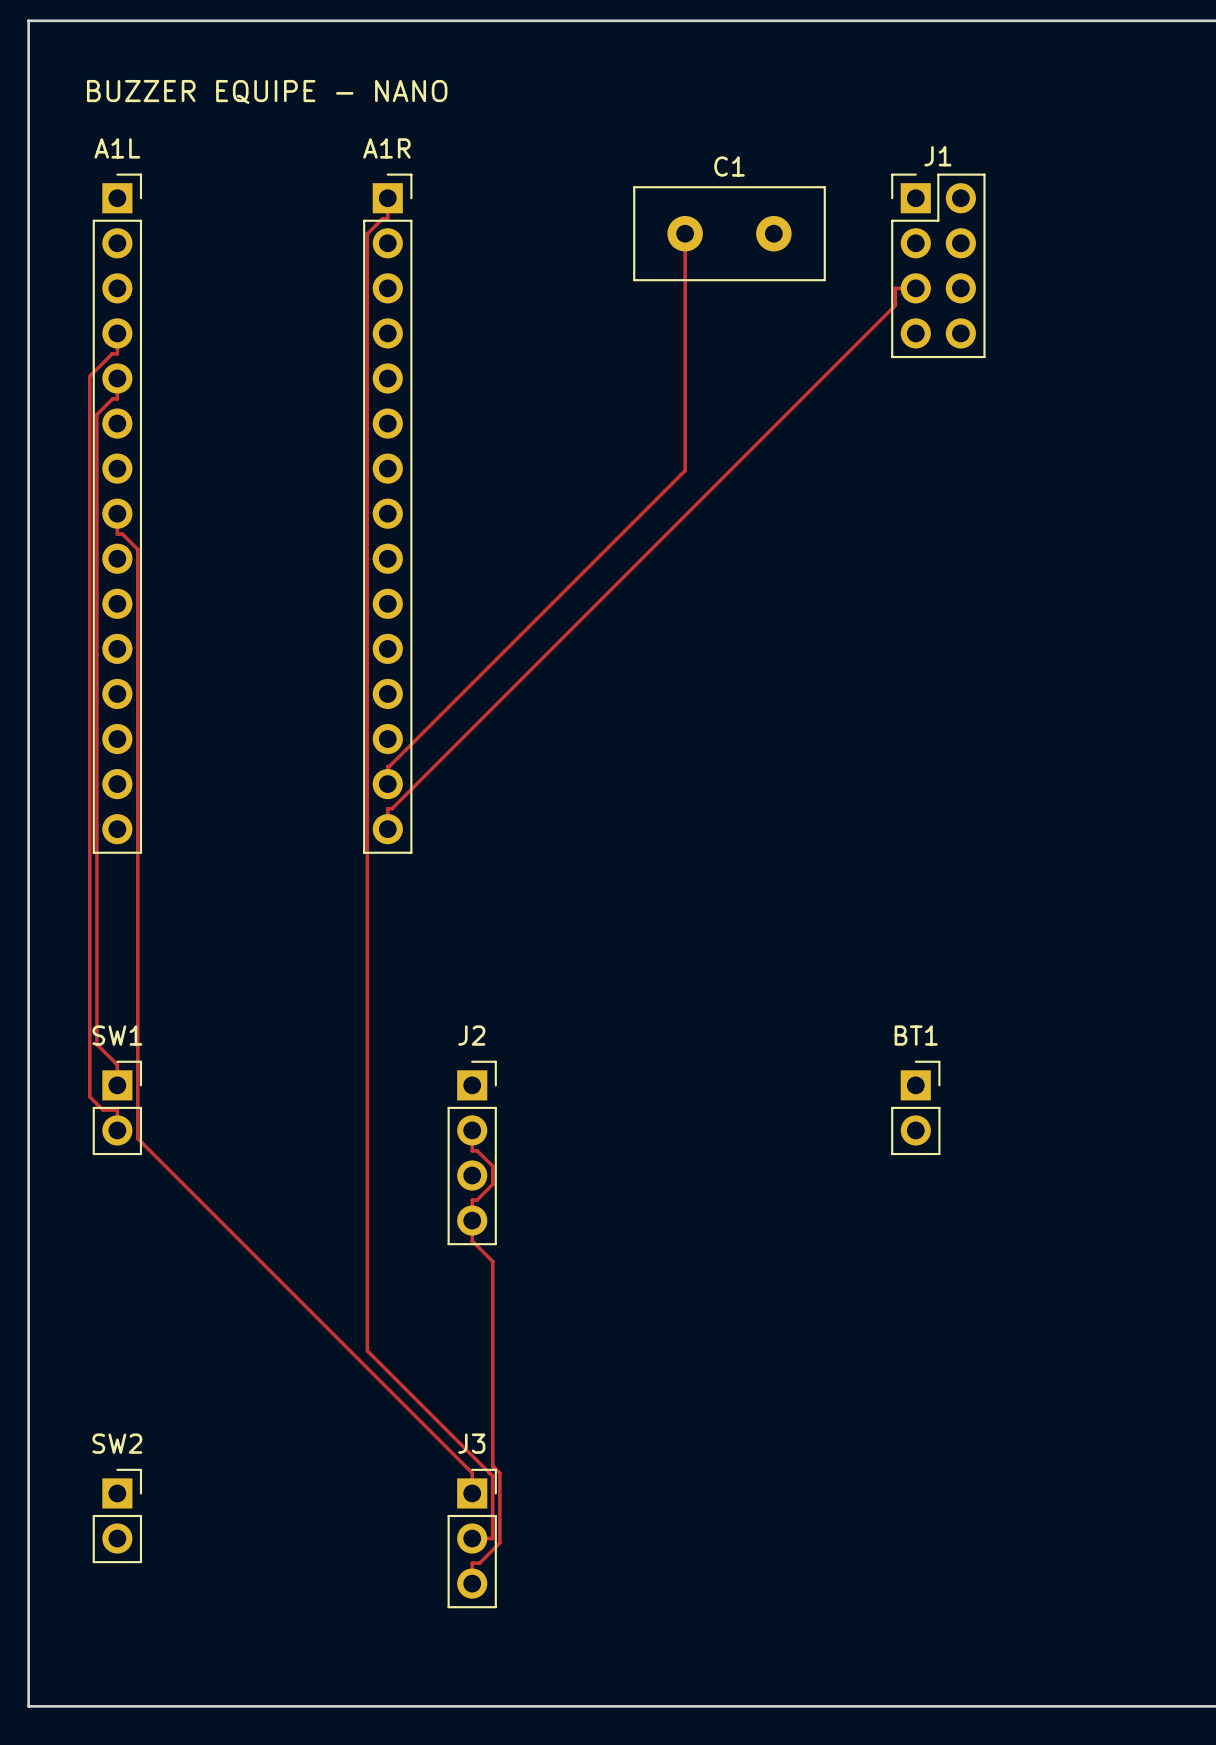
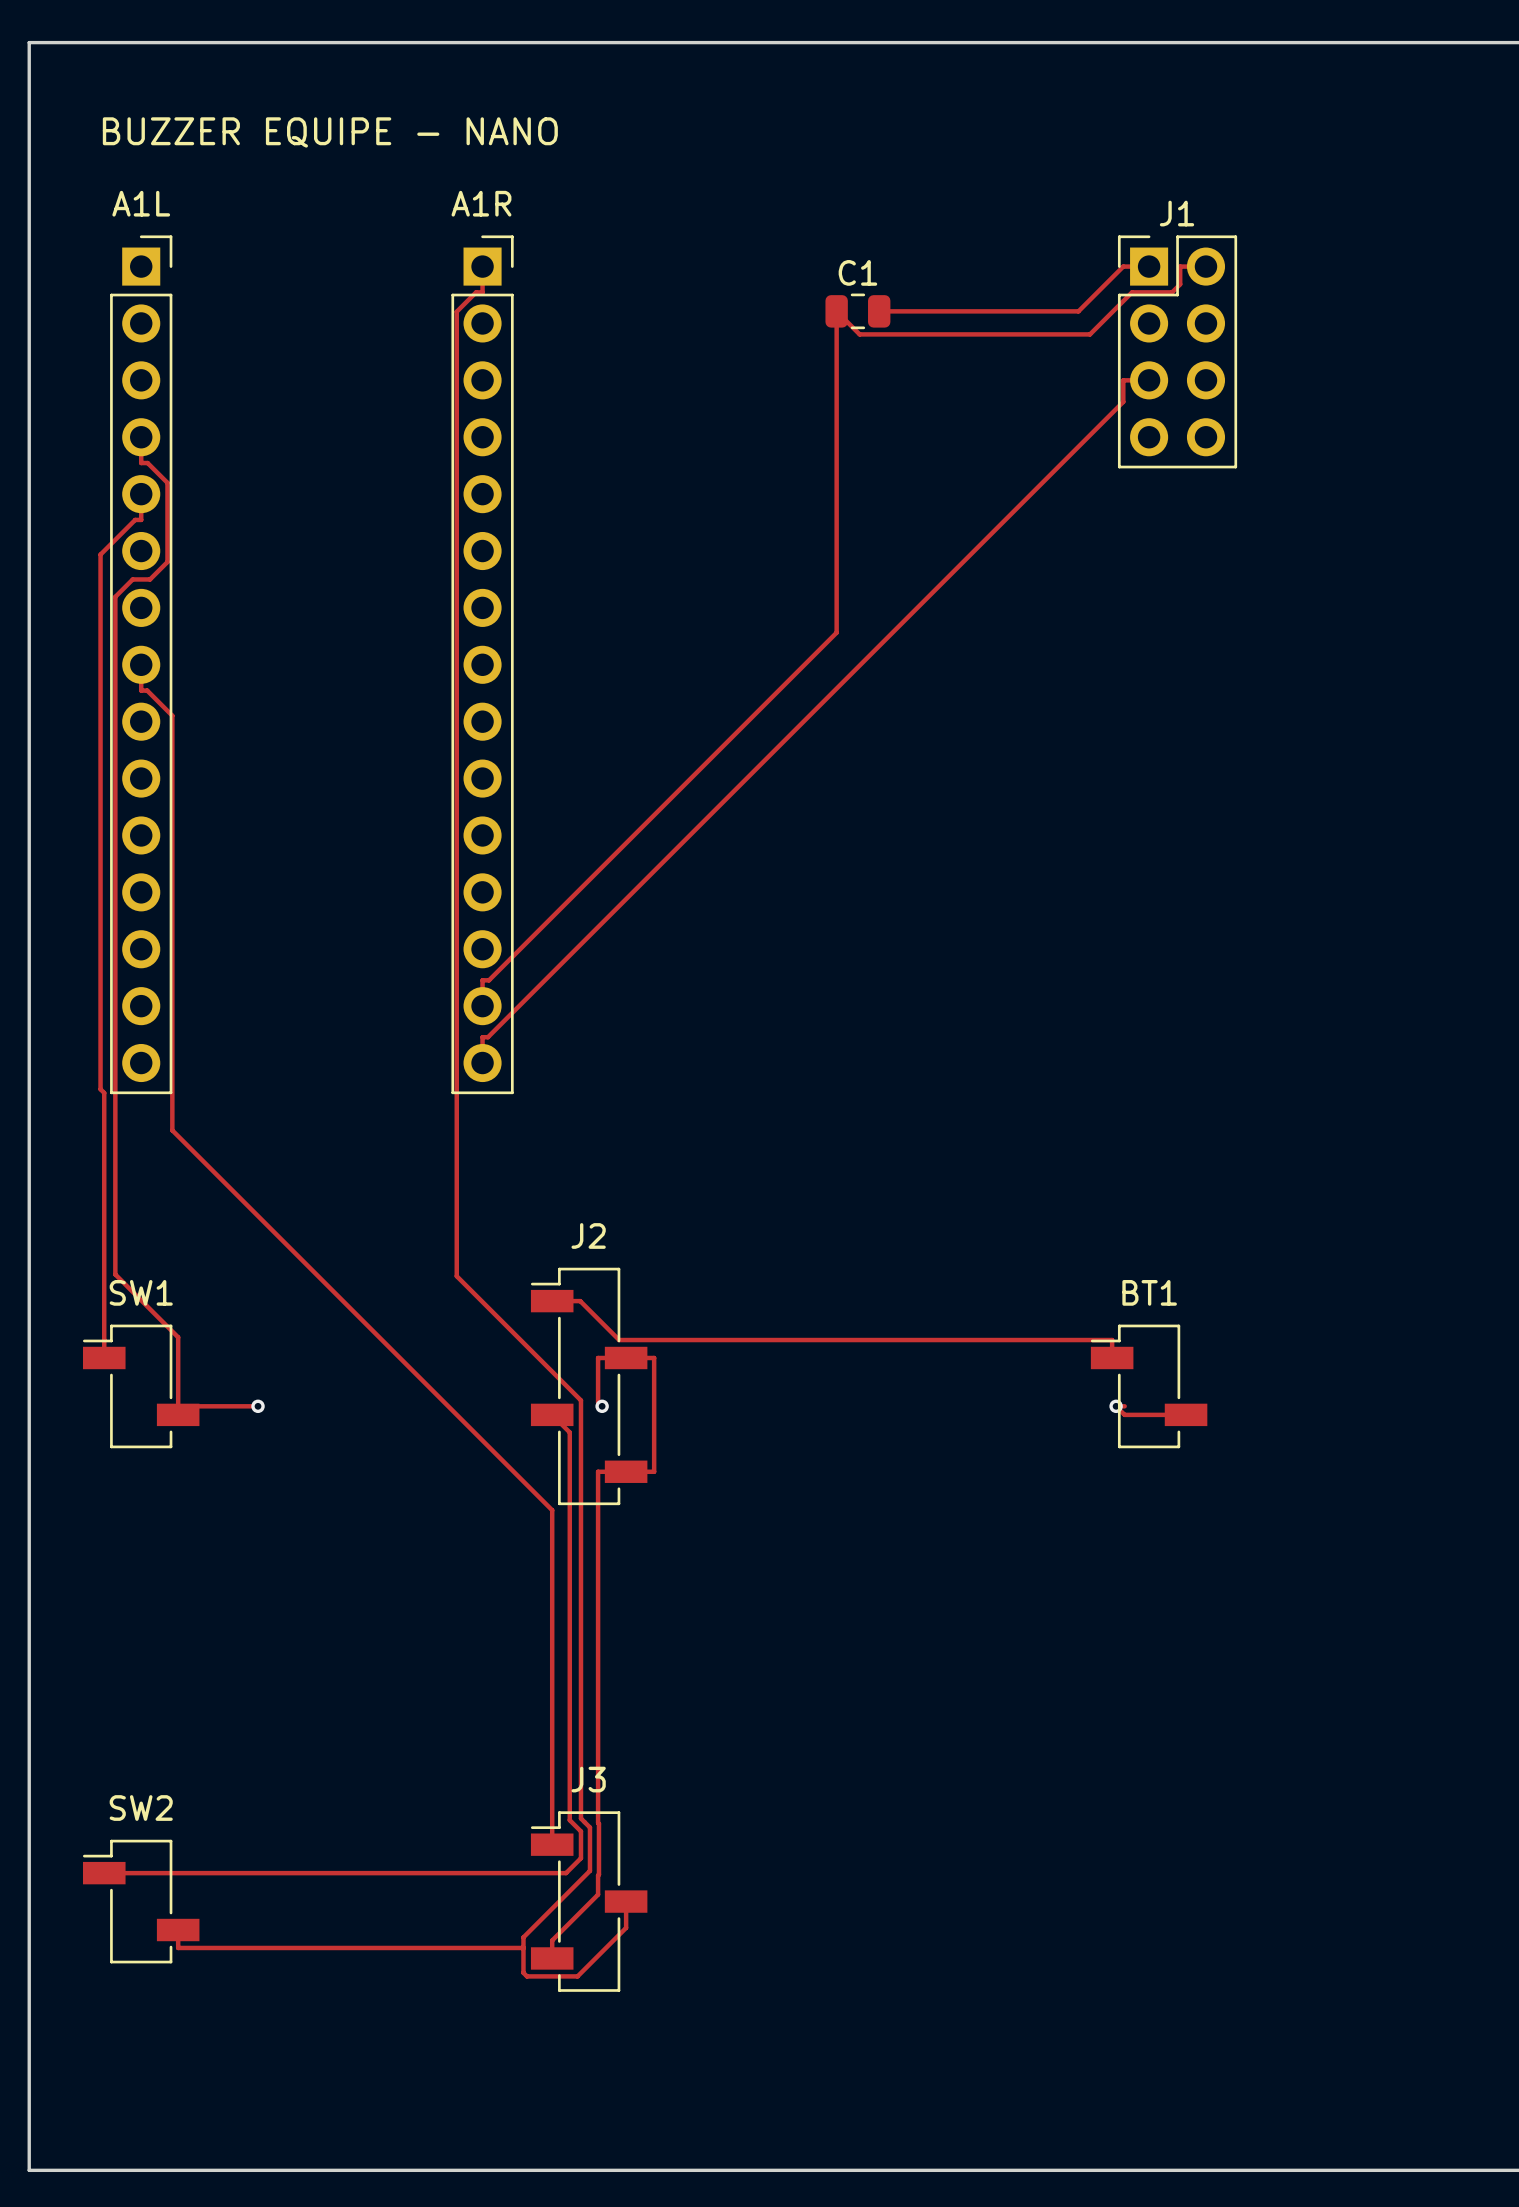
C1 name position: C1 (729, 166) -> C1 (857, 272)
C1 footprint: [633, 186, 826, 282] -> [825, 293, 891, 330]
track: none -> (1149, 266) (1123, 266) (1078, 311) (879, 311)
track: (685, 233) (685, 470) (387, 766) -> (1205, 266) (1180, 266) (1180, 284) (1172, 292) (1132, 292) (1090, 334) (859, 334) (836, 311) (836, 632) (489, 980) (482, 980) (482, 984)
track: (117, 353) (112, 353) (89, 376) (89, 1096) (102, 1110) (117, 1110) (117, 1130) -> (141, 463) (147, 463) (167, 482) (167, 562) (150, 579) (132, 579) (115, 596) (115, 1274) (178, 1337) (178, 1414)
track: (96, 414) (96, 1044) (117, 1064) (117, 1085) -> (115, 539) (100, 554) (100, 1089) (104, 1092) (104, 1357)
track: (122, 534) (137, 549) (137, 1138) (472, 1473) (472, 1493) -> (147, 690) (172, 715) (172, 1130) (552, 1510) (552, 1844)
track: (367, 998) (367, 1350) (492, 1476) (492, 1538) (472, 1538) -> (456, 1276) (580, 1400) (580, 1818) (589, 1827) (589, 1870) (523, 1937) (523, 1972) (527, 1976) (577, 1976) (626, 1927) (626, 1901)
track: none -> (552, 1301) (580, 1301) (619, 1340) (1112, 1340) (1112, 1357)
SW1 footprint: [92, 1060, 143, 1156] -> [82, 1324, 200, 1449]
J2 footprint: [447, 1060, 497, 1246] -> [530, 1267, 648, 1506]
BT1 footprint: [891, 1060, 941, 1156] -> [1090, 1324, 1208, 1449]
track: none -> (178, 1406) (258, 1406)
via: none -> (258, 1406)
track: none -> (602, 1406) (598, 1402) (598, 1357) (654, 1357) (654, 1471) (598, 1471) (598, 1894) (552, 1940) (552, 1958)
via: none -> (602, 1406)
via: none -> (1116, 1406)
track: none -> (1124, 1406) (1116, 1406) (1124, 1414) (1186, 1414)
track: none -> (552, 1414) (569, 1432) (569, 1820) (580, 1831) (580, 1858) (566, 1873) (104, 1873)
track: (472, 1130) (472, 1150) (477, 1150) (492, 1166) (492, 1184) (476, 1200) (472, 1200) (472, 1241) (492, 1261) (492, 1466) (499, 1473) (499, 1542) (479, 1563) (472, 1563) (472, 1583) -> none
SW2 footprint: [92, 1468, 143, 1564] -> [82, 1839, 200, 1964]
J3 footprint: [447, 1468, 497, 1609] -> [530, 1811, 648, 1992]
track: none -> (178, 1930) (178, 1947) (523, 1947)

